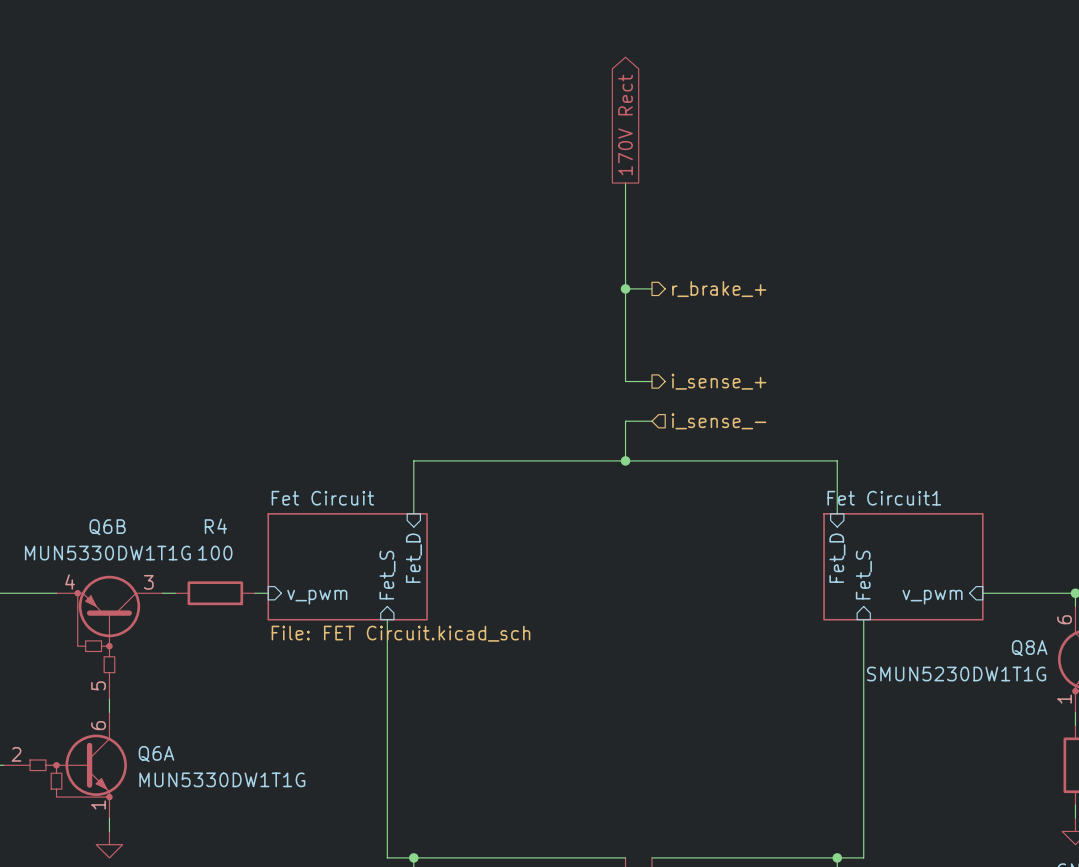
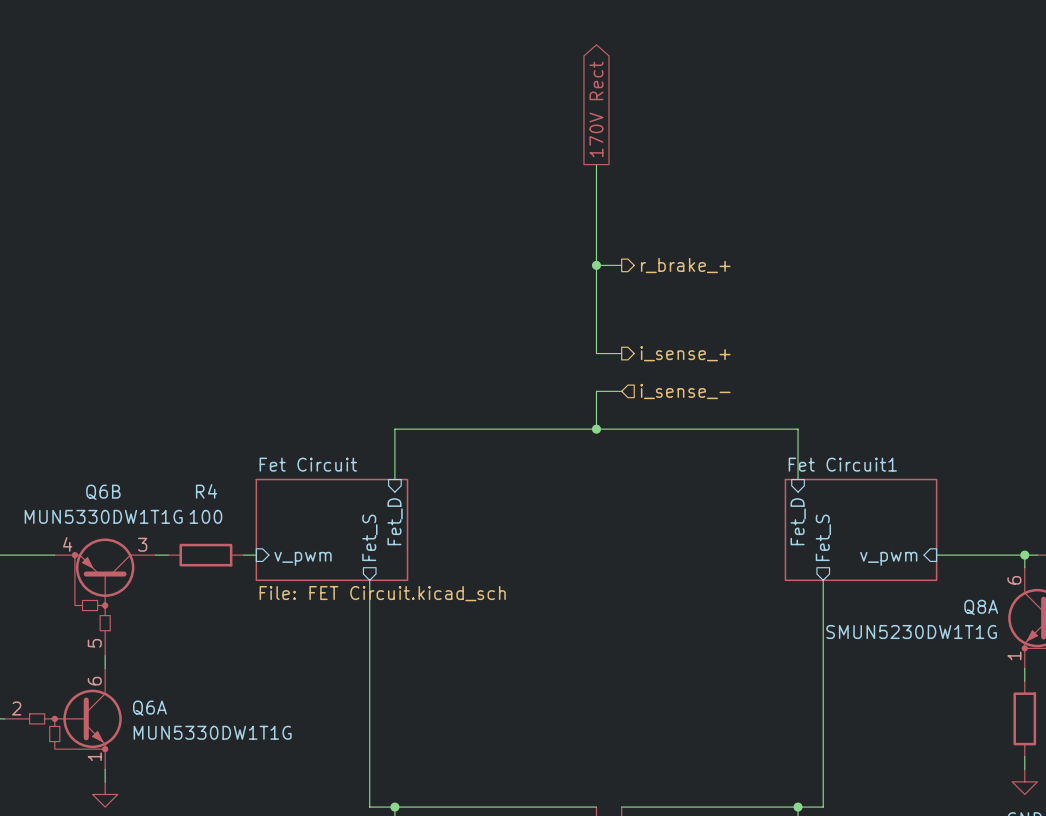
sheet pin shape: input (387, 575) -> output (369, 537)
sheet pin shape: input (863, 575) -> output (823, 537)

